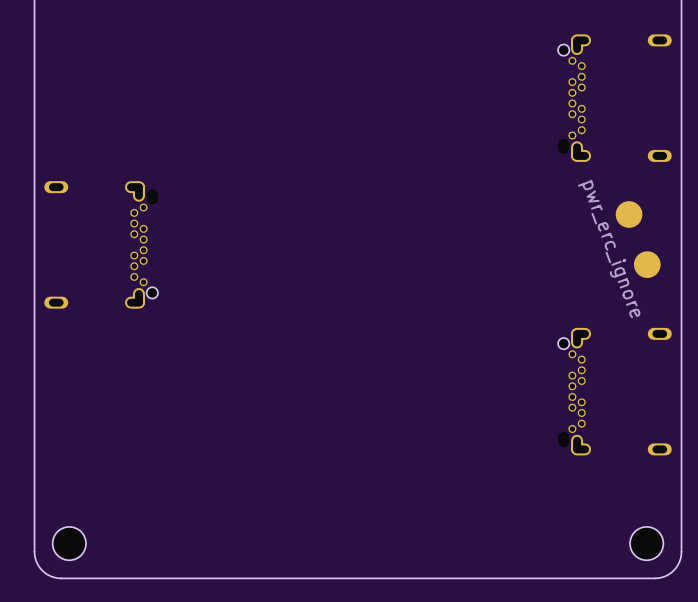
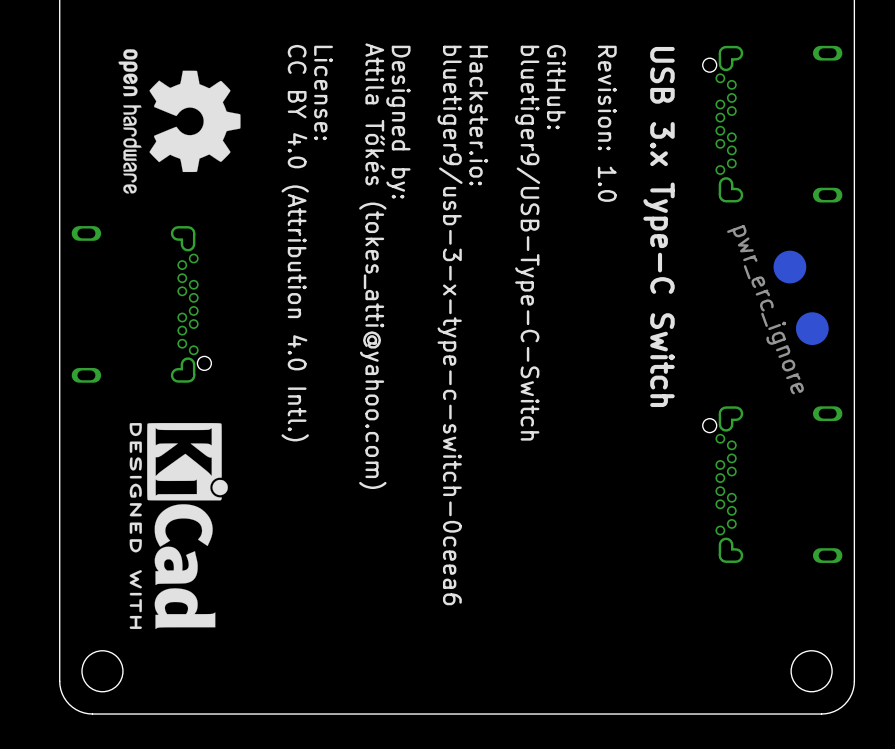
drawing: none -> [118, 49, 241, 194]
text: none -> GitHub: (556, 87)
text: none -> License: (323, 92)
text: none -> Hackster.io: (478, 115)
text: none -> Designed by: (398, 122)
text: none -> Revision: 1.0 (607, 123)
text: none -> USB 3.x Type-C Switch (659, 226)
text: none -> CC BY 4.0 (Attribution 4.0 Intl.) (295, 243)
text: none -> bluetiger9/USB-Type-C-Switch (527, 243)
text: none -> Attila Tőkés (tokes_atti@yahoo.com) (372, 266)
text: none -> bluetiger9/usb-3-x-type-c-switch-0ceea6 (450, 325)
drawing: none -> [129, 422, 228, 630]

